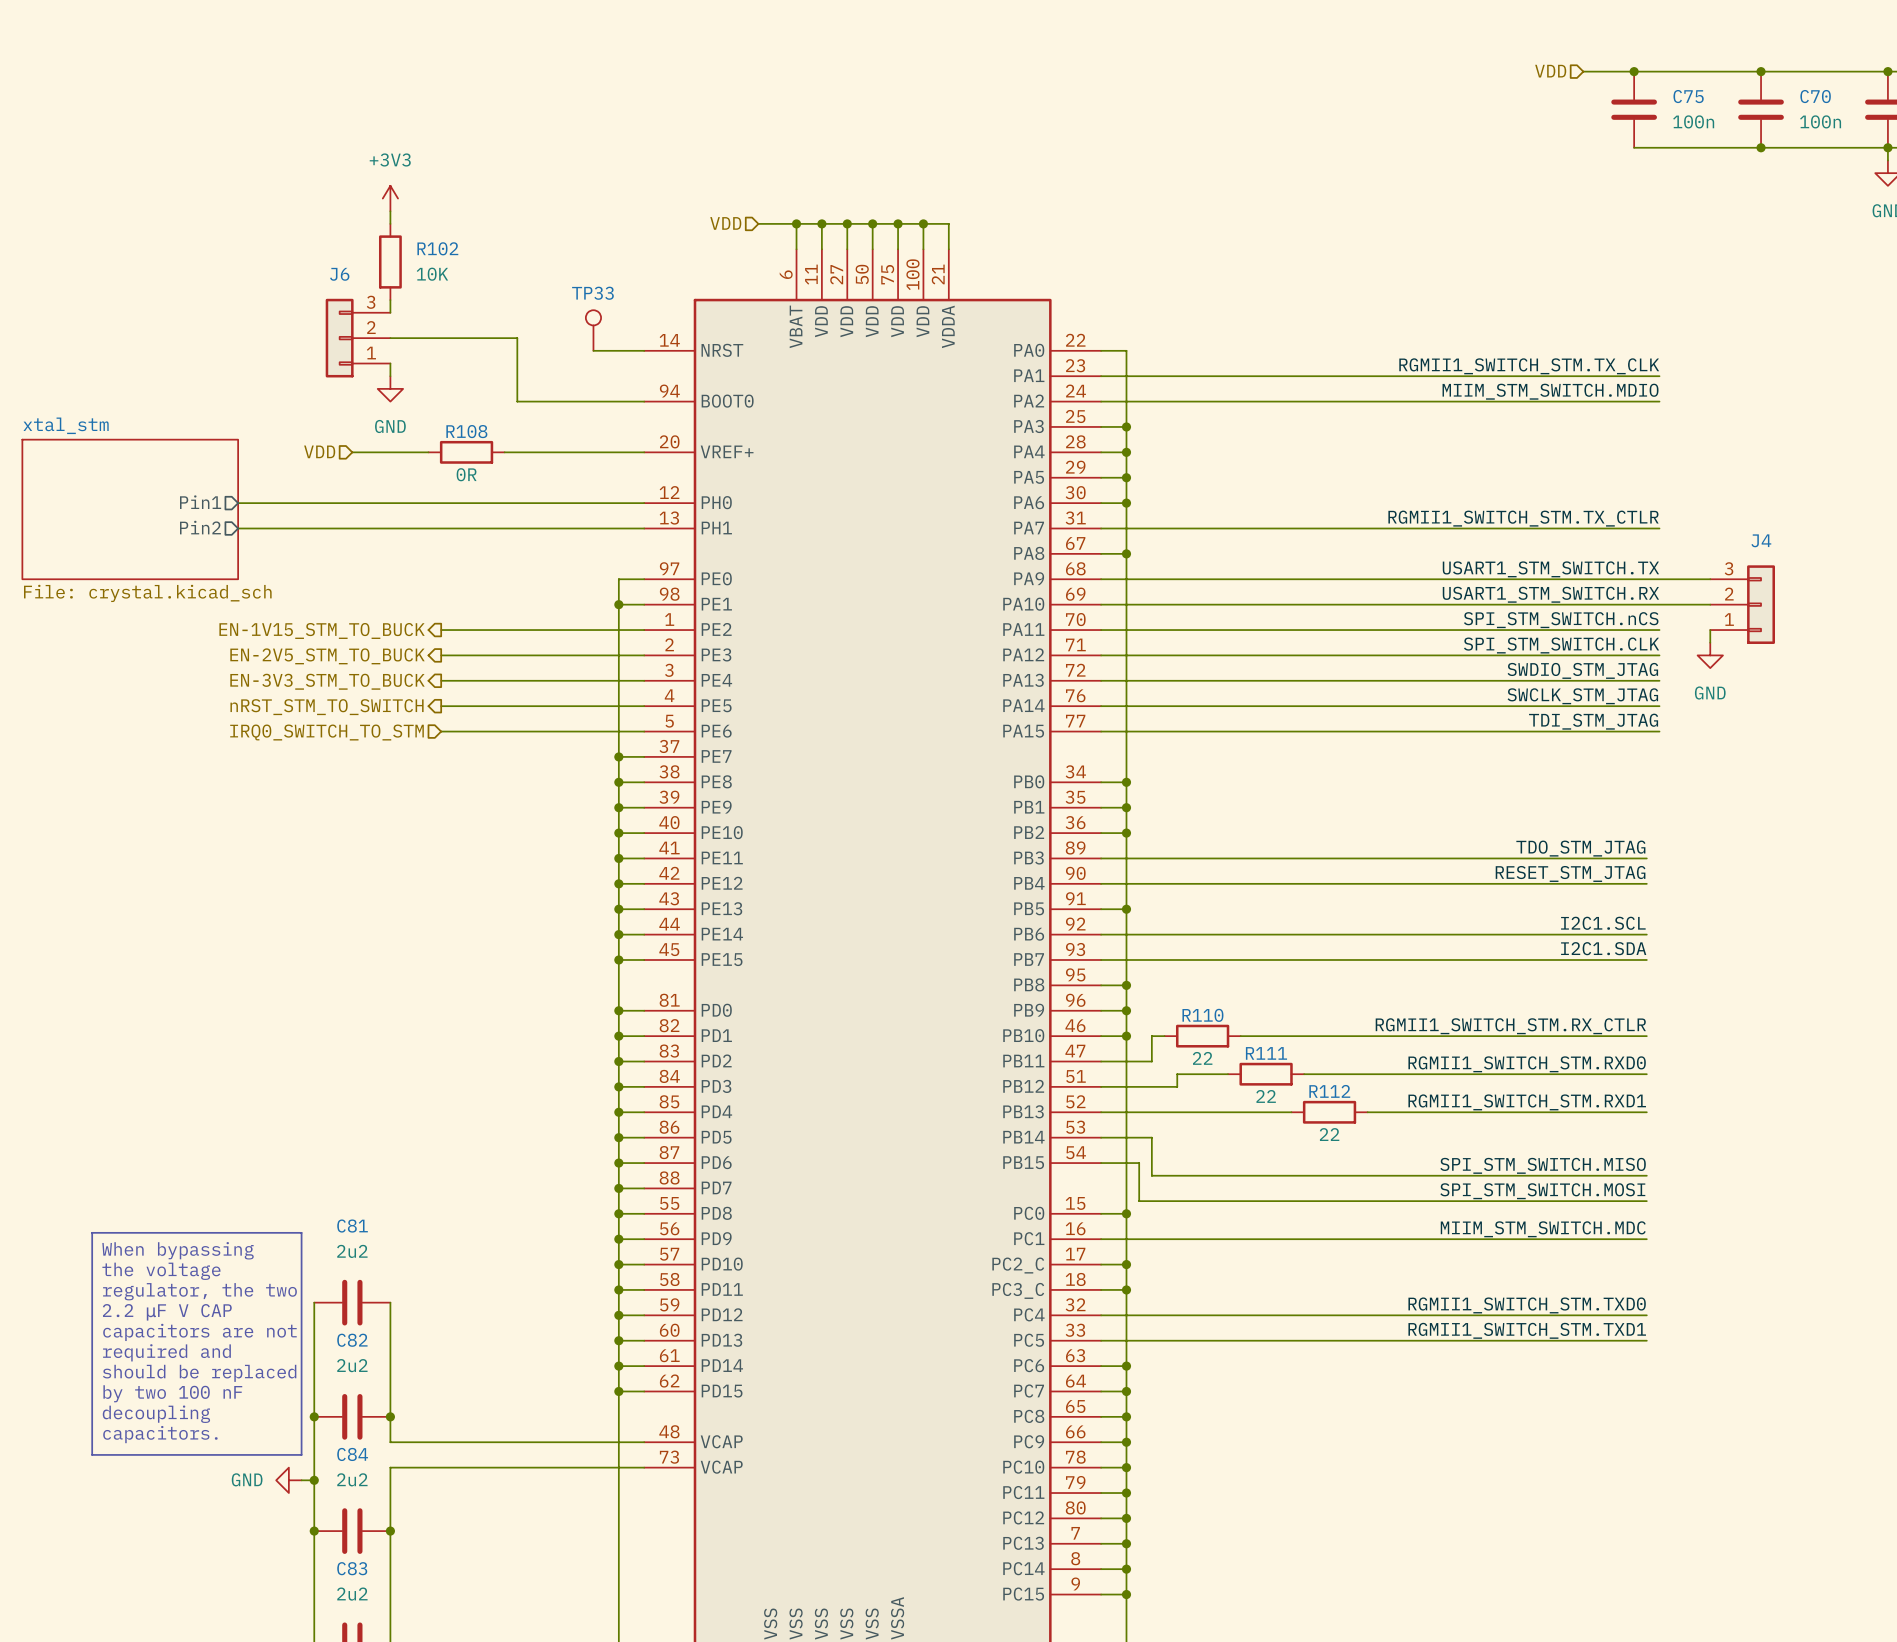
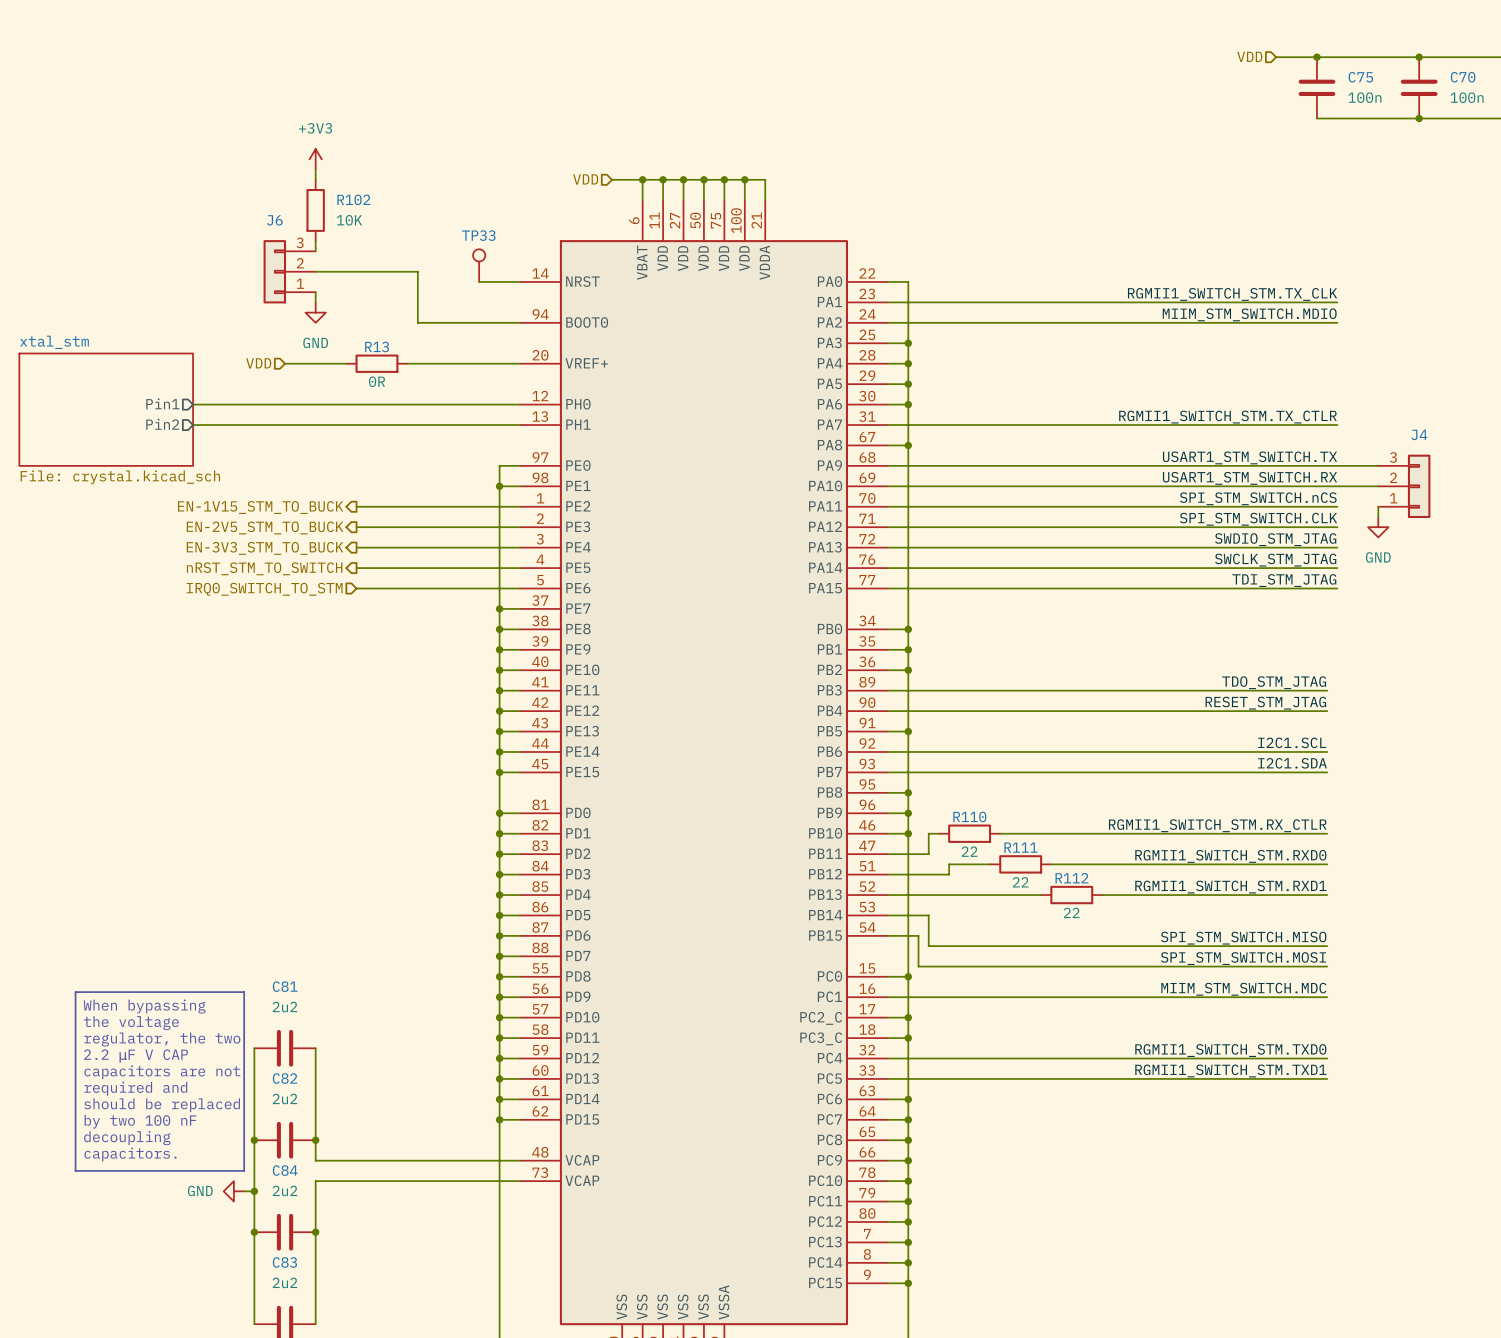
R108 name: R108 (466, 431) -> R13 (377, 346)

